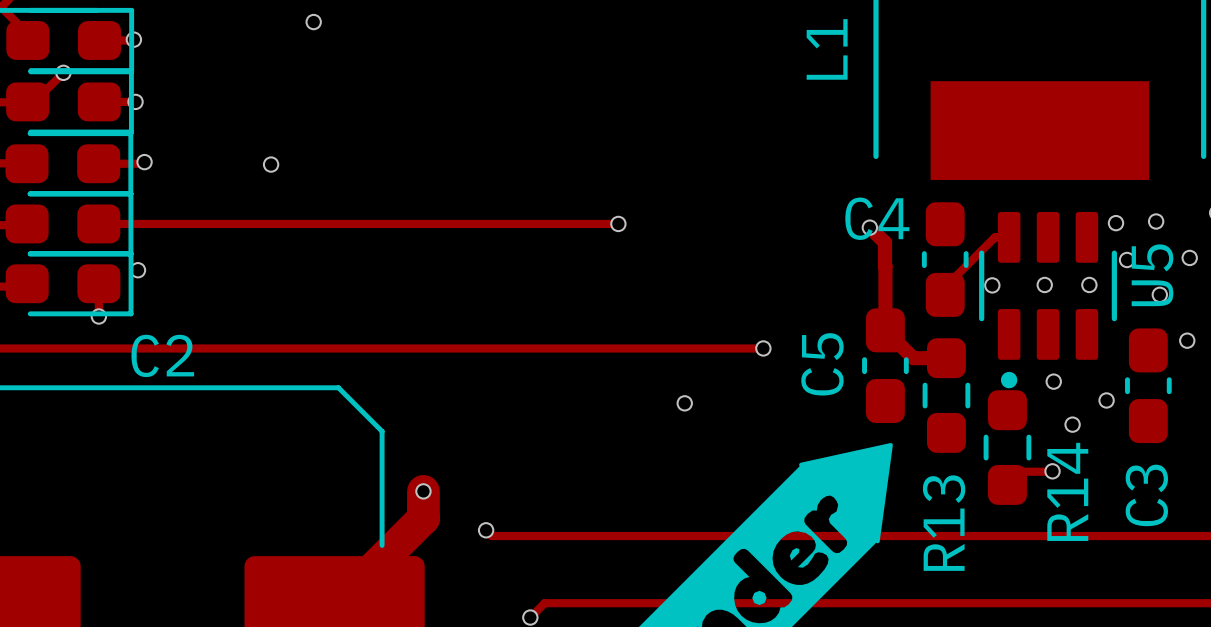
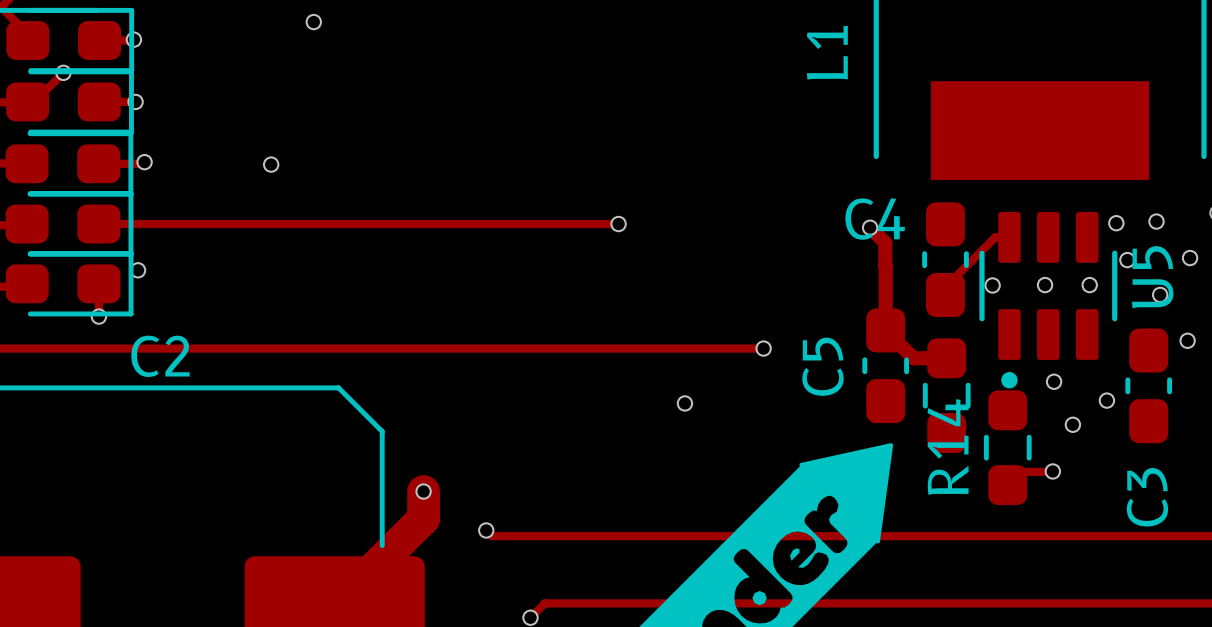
R14 name position: R14 (1067, 491) -> R14 (948, 447)
R13 name: R13 (944, 523) -> none

